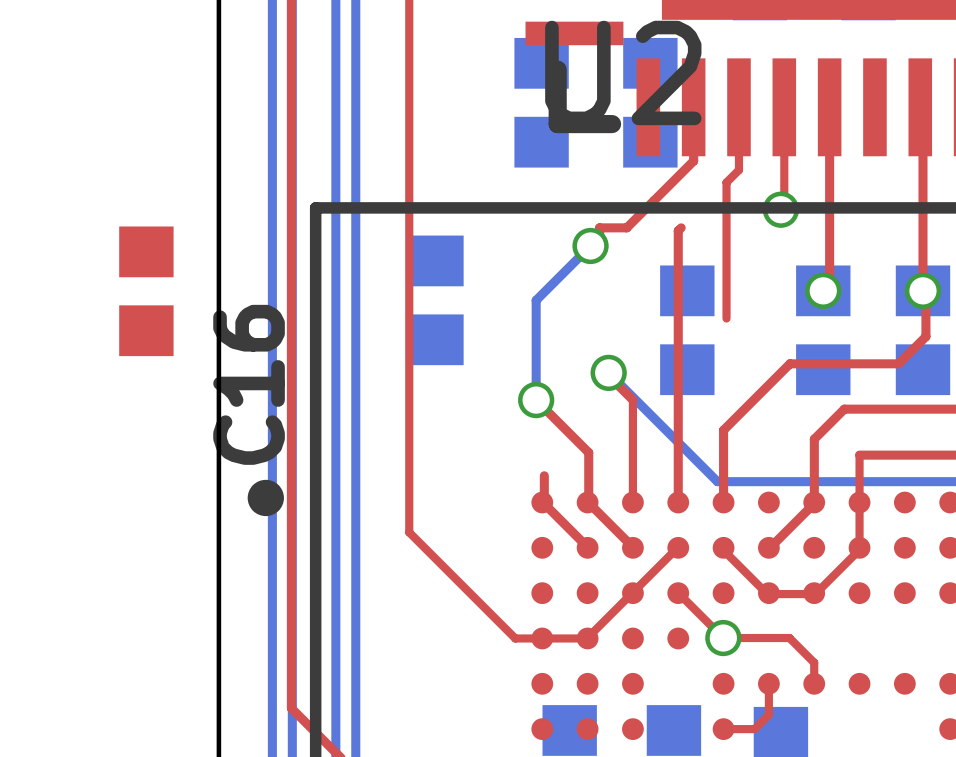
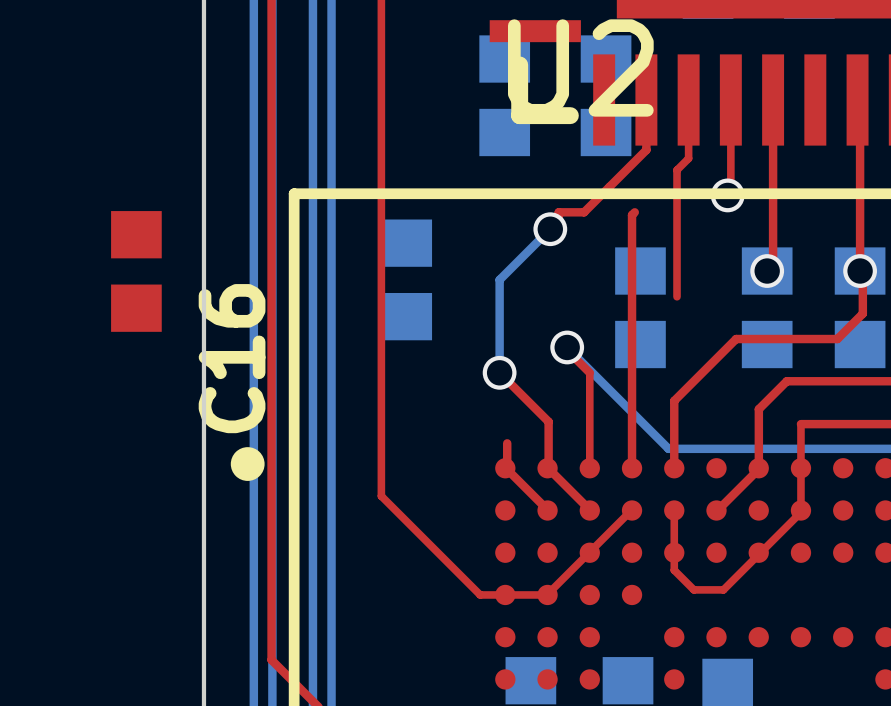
top track: (723, 550) (767, 594) (815, 594) -> (674, 512) (674, 570) (693, 589) (723, 589) (759, 553)
top track: (678, 593) (723, 638) (789, 638) (814, 662) (814, 683) -> none
via: (723, 638) -> none
top track: (768, 683) (768, 714) (754, 729) (723, 729) -> none

